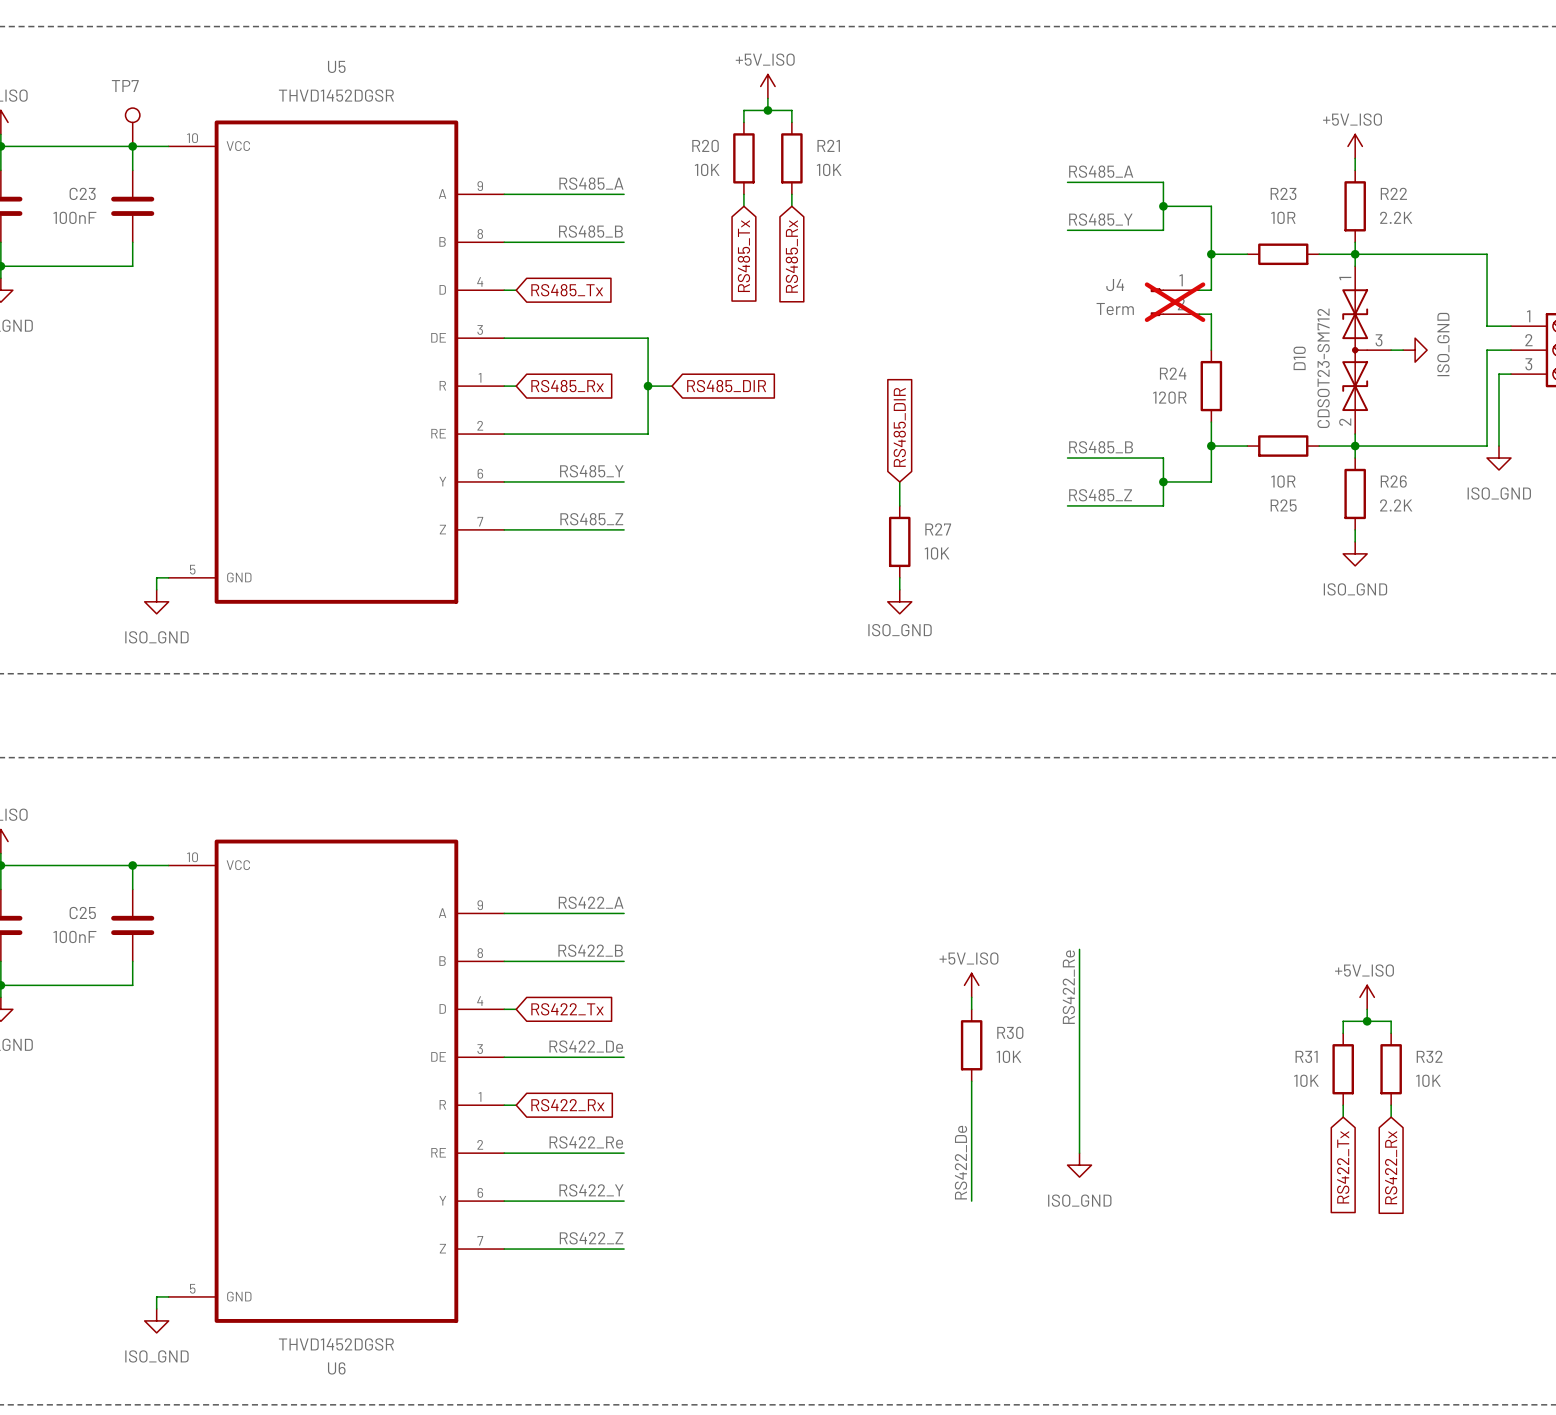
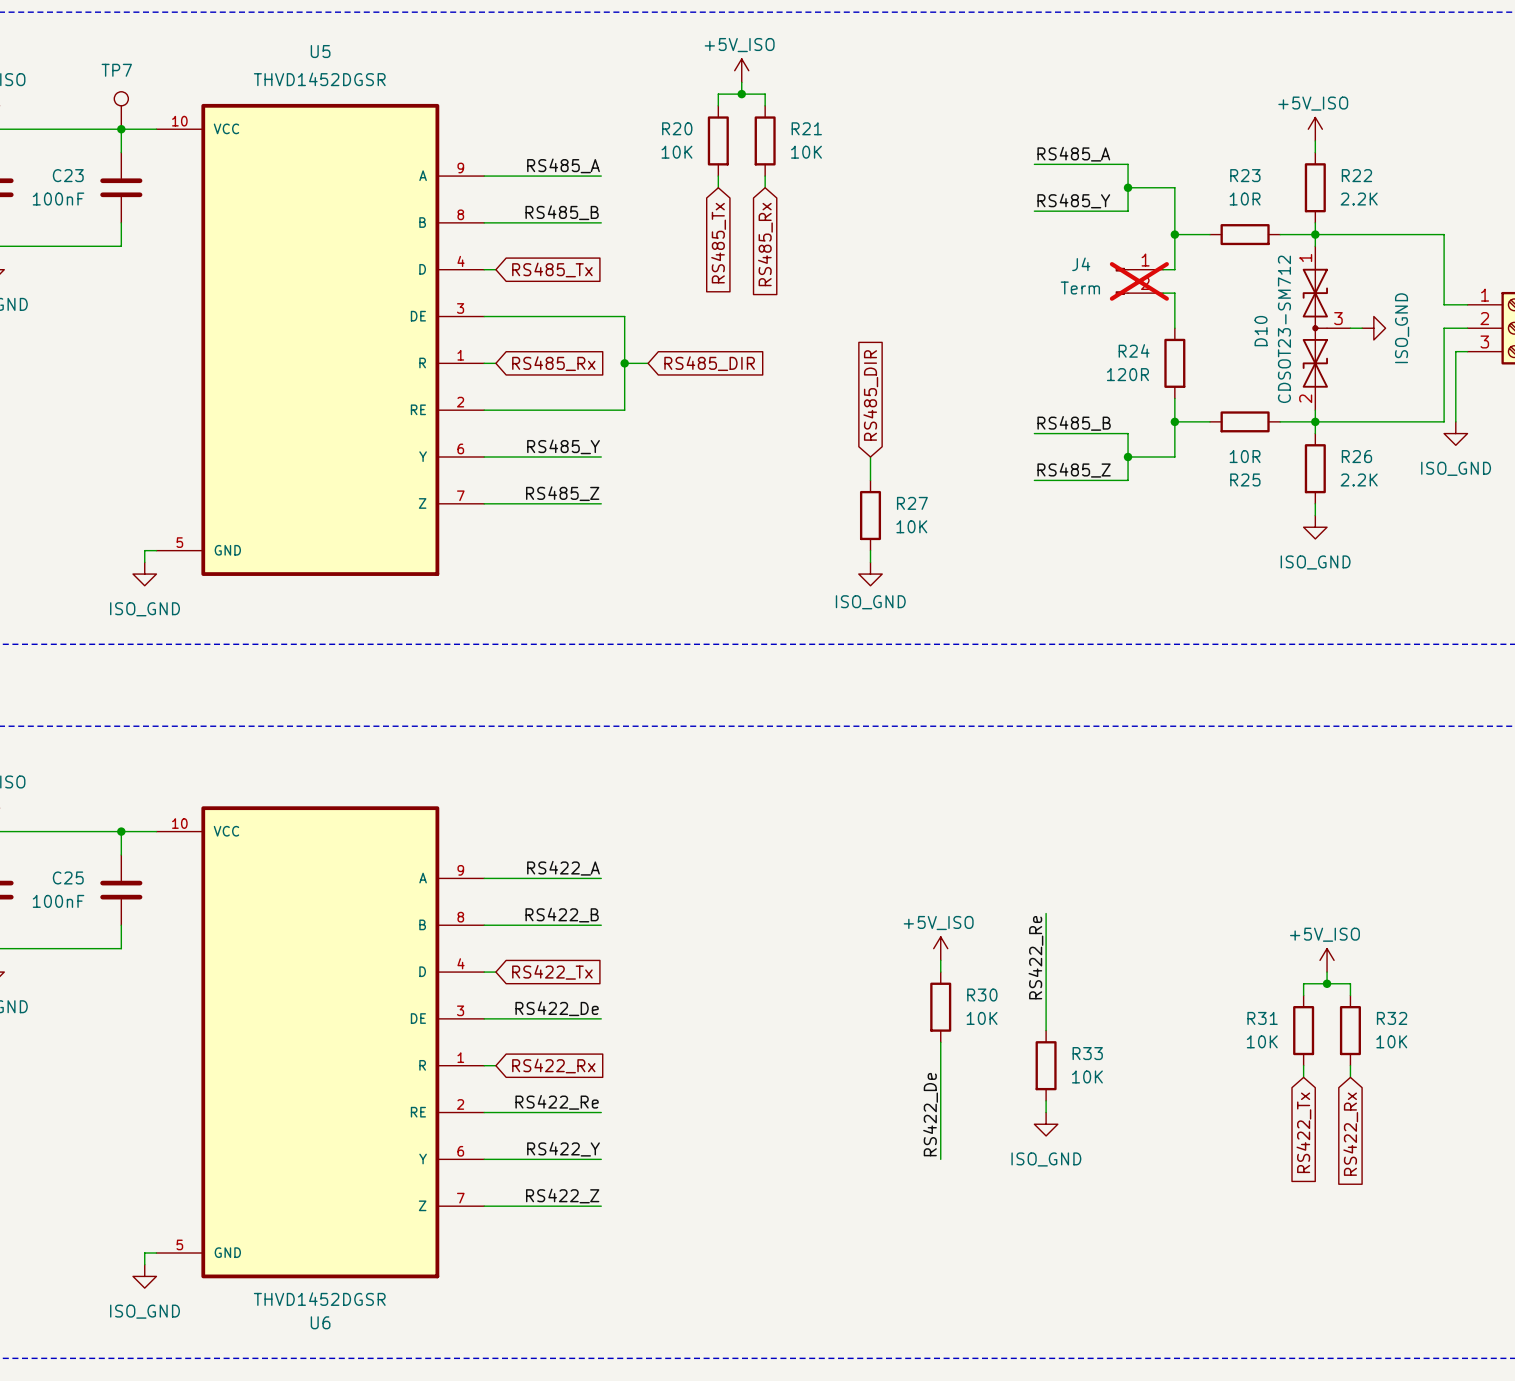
wire: (1079, 1069) (1079, 1141) -> none
R33: none -> 10K (1046, 1065)

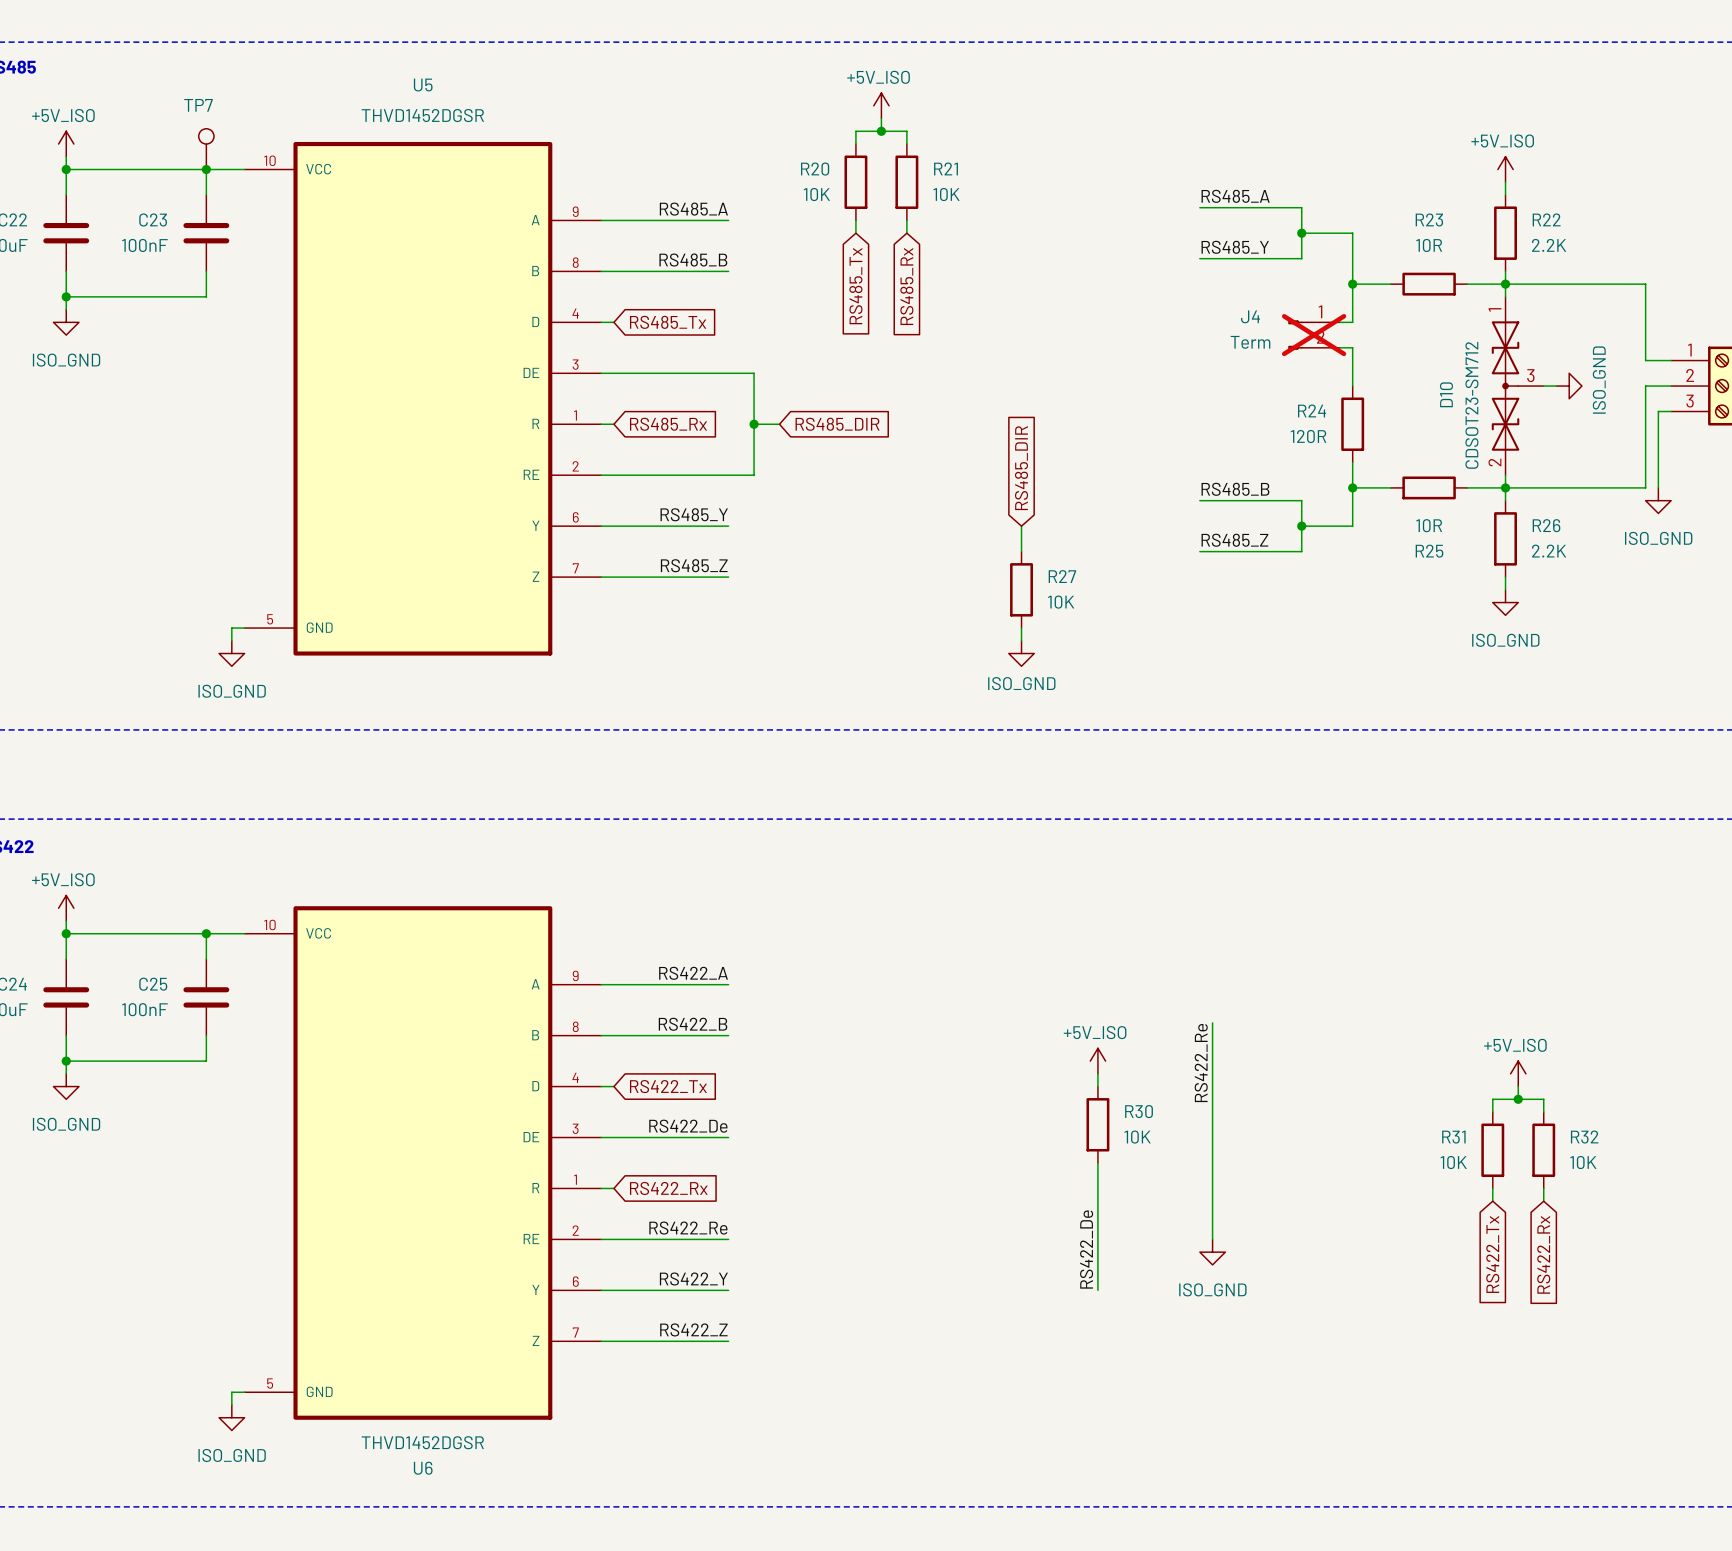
wire: none -> (1212, 1150) (1212, 1226)
R33: 10K (1046, 1065) -> none

